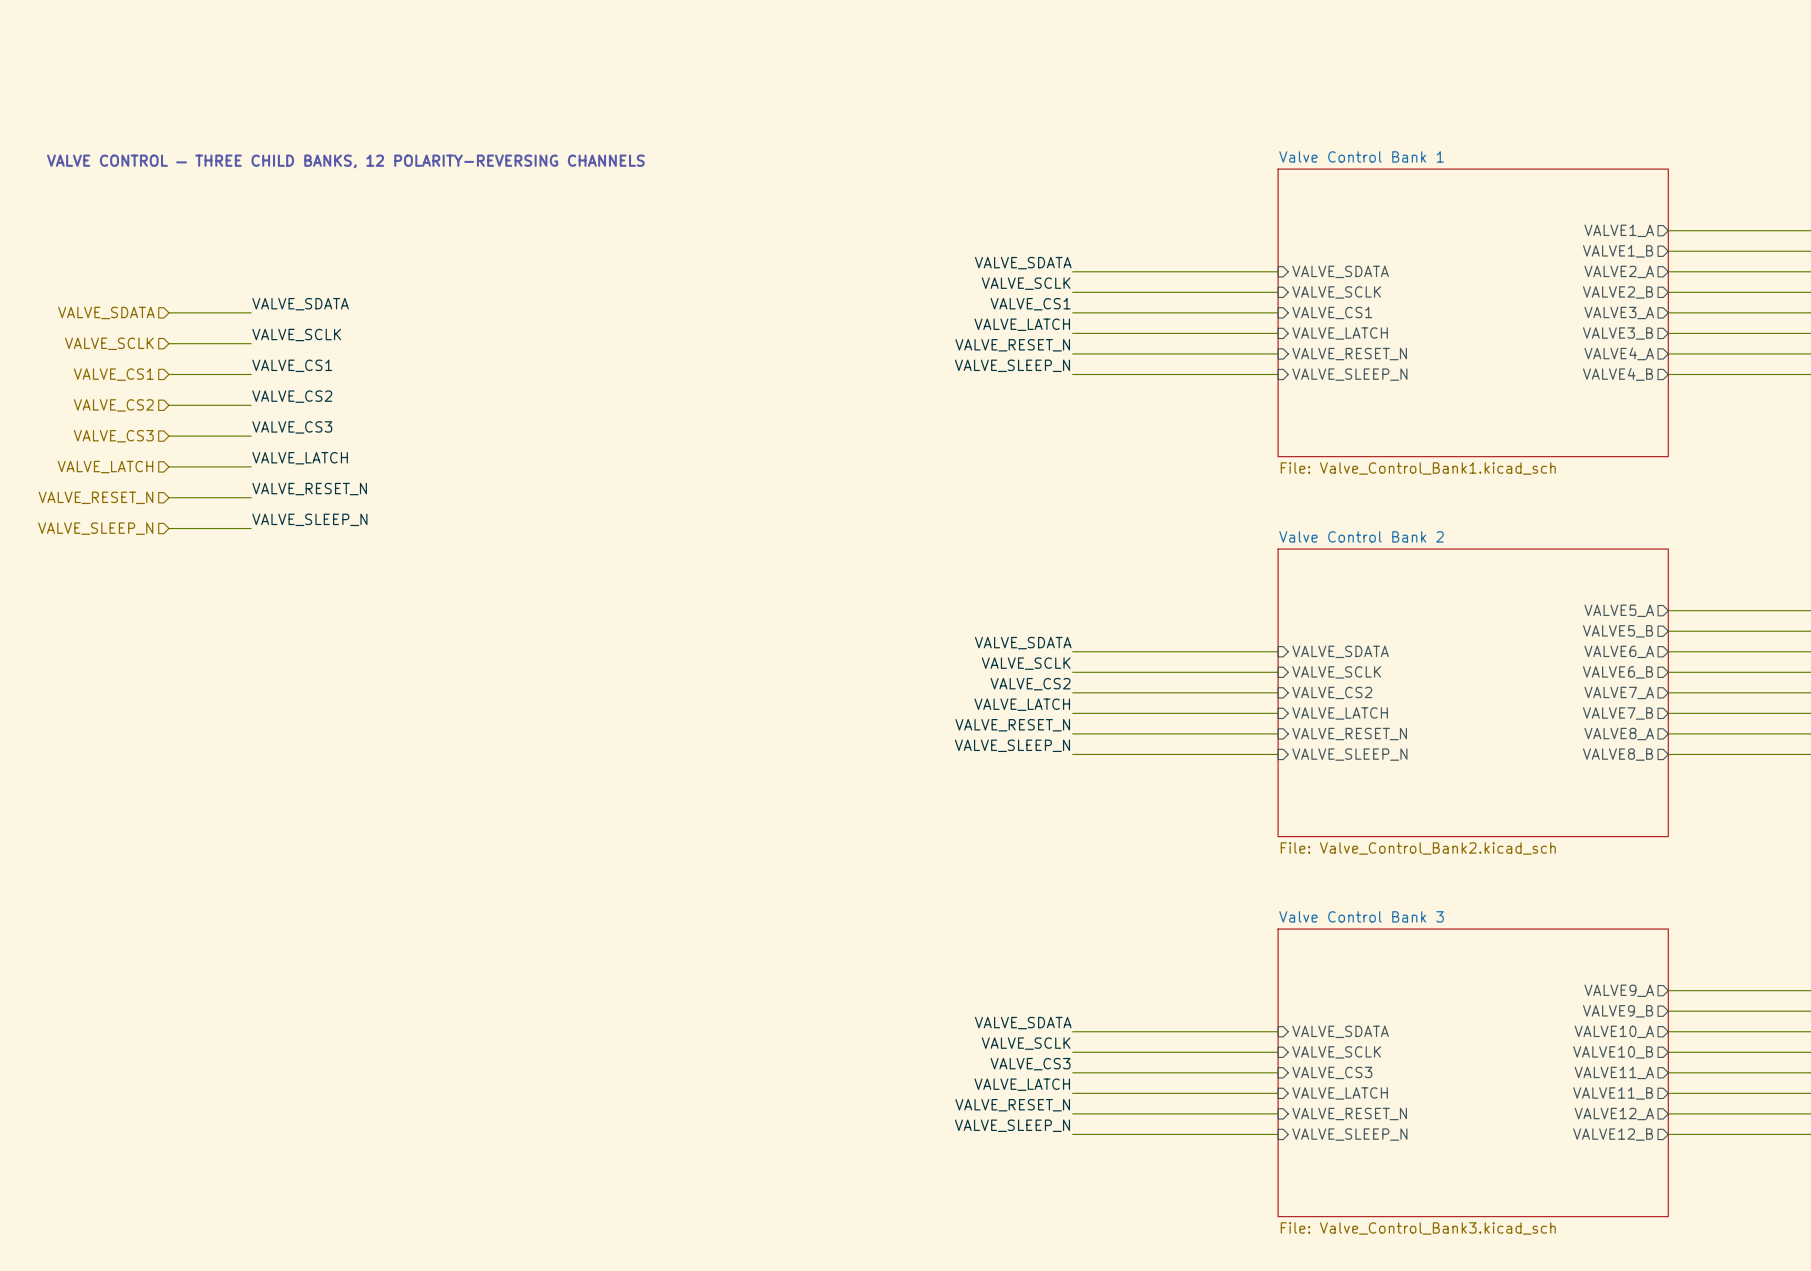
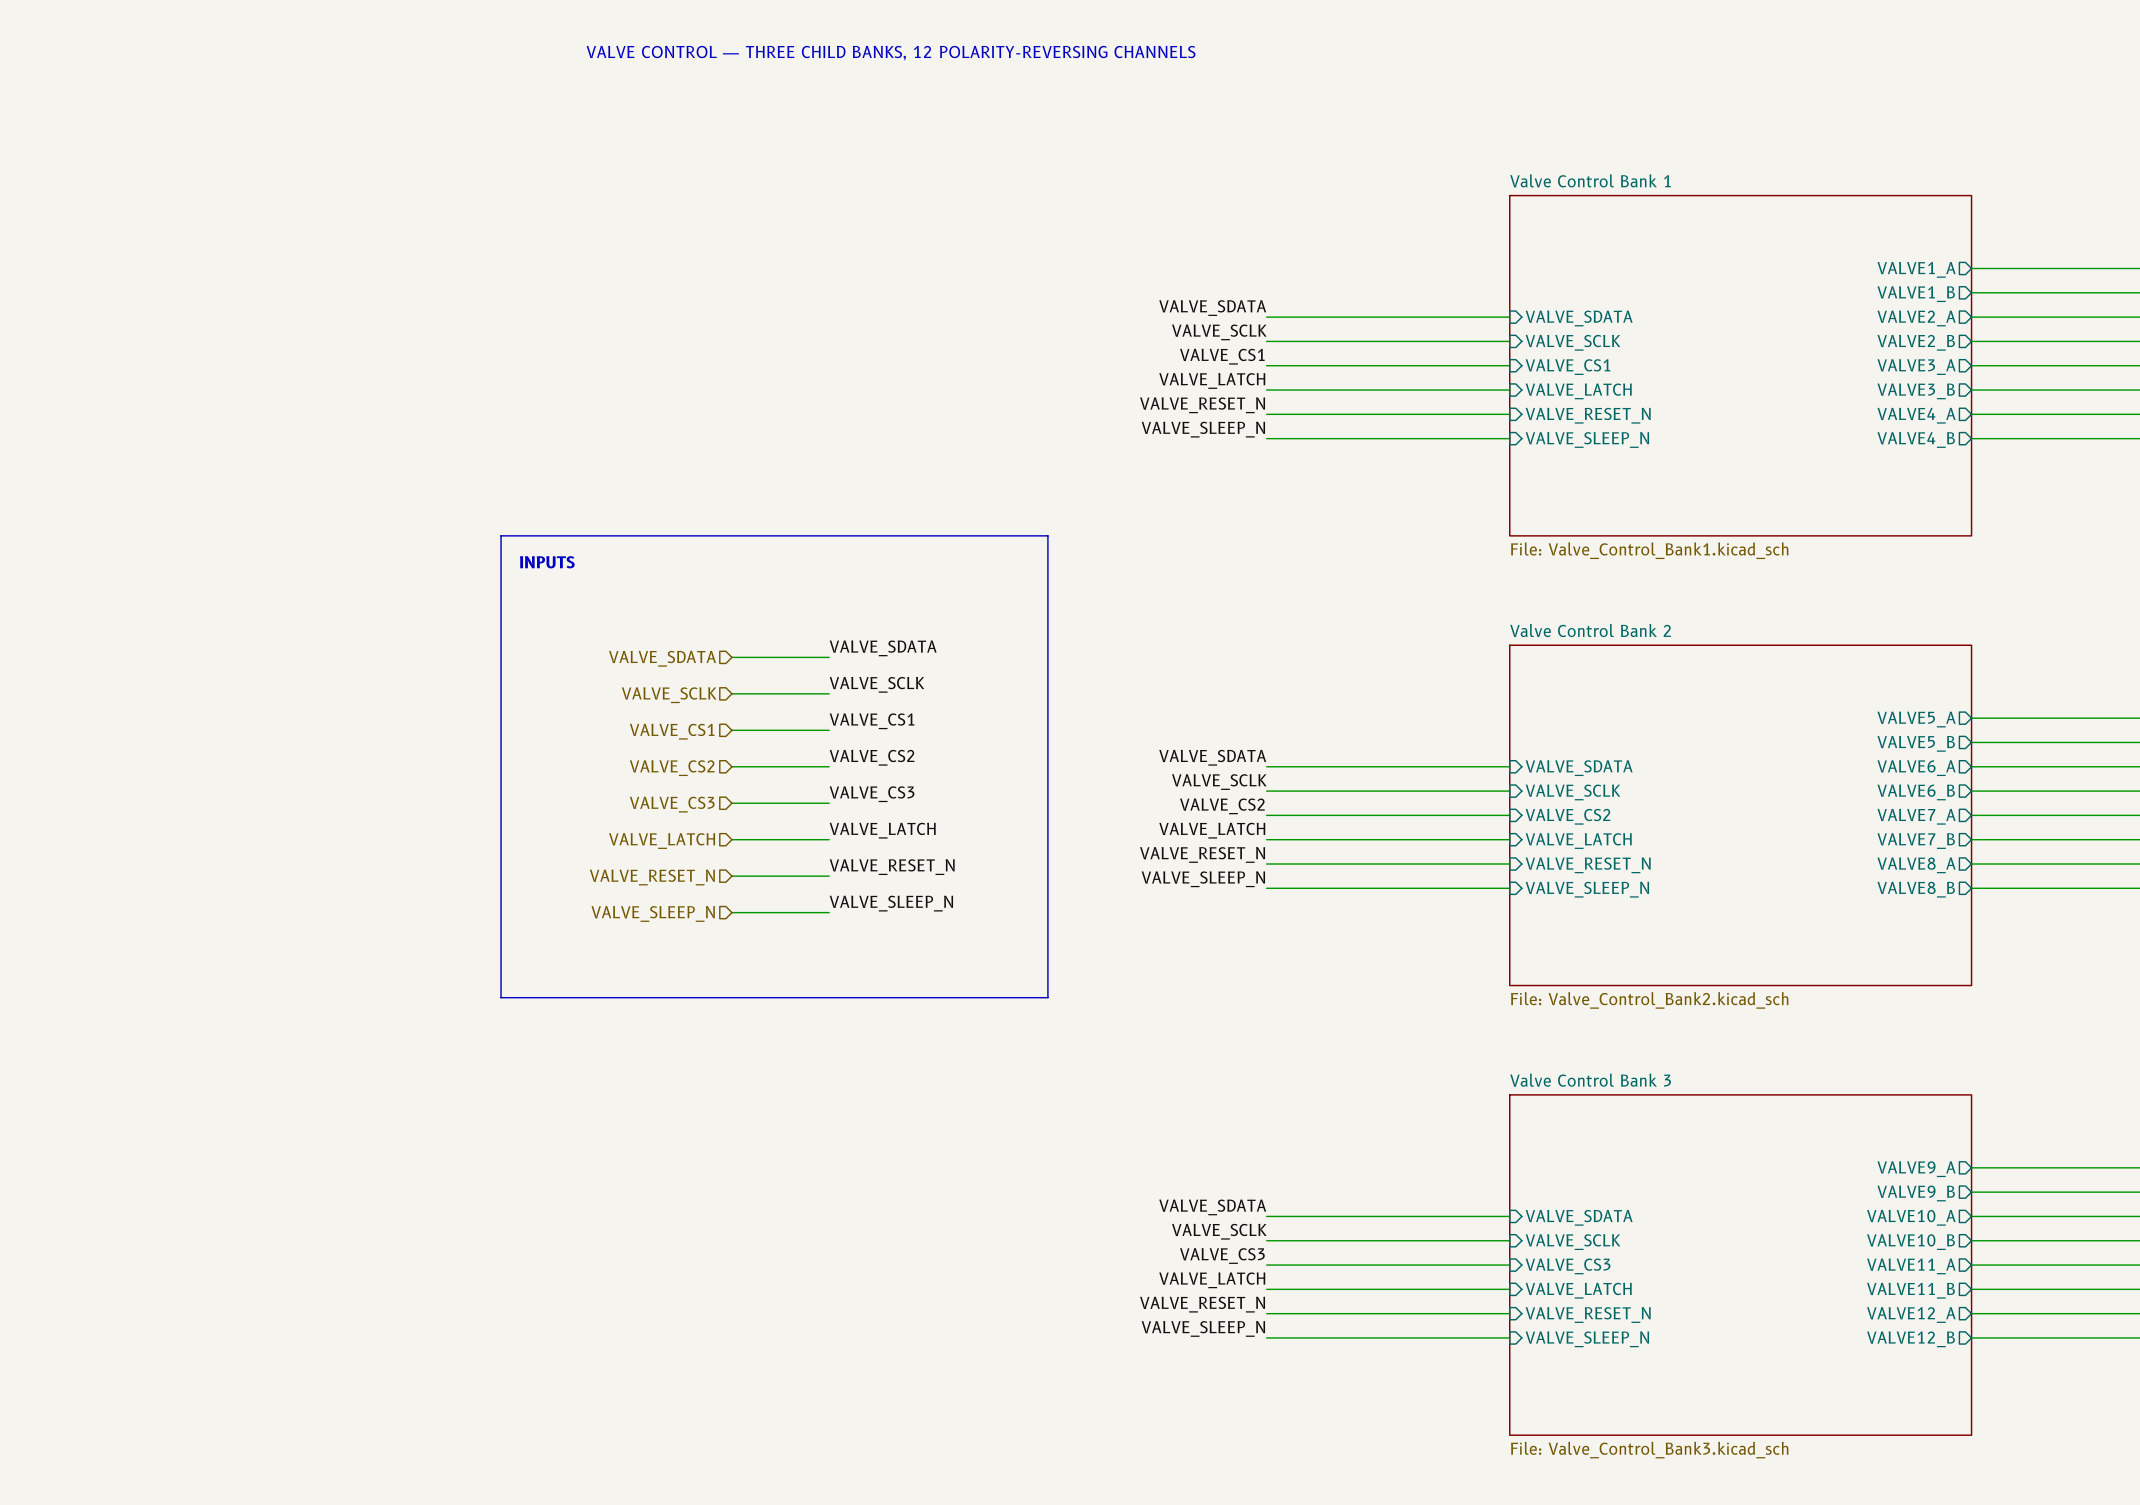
text: none -> VALVE CONTROL — THREE CHILD BANKS, 12 POLARITY-REVERSING CHANNELS (891, 53)
text: VALVE CONTROL — THREE CHILD BANKS, 12 POLARITY-REVERSING CHANNELS (345, 161) -> none
label: VALVE_SDATA (300, 304) -> none
hierarchical label: VALVE_SDATA (106, 312) -> none
wire: (168, 312) (251, 312) -> none
label: VALVE_SCLK (296, 335) -> none
hierarchical label: VALVE_SCLK (109, 343) -> none
wire: (168, 343) (251, 343) -> none
label: VALVE_CS1 (292, 365) -> none
hierarchical label: VALVE_CS1 (113, 374) -> none
wire: (168, 374) (251, 374) -> none
label: VALVE_CS2 (292, 396) -> none
hierarchical label: VALVE_CS2 (113, 405) -> none
wire: (168, 405) (251, 405) -> none
label: VALVE_CS3 (292, 427) -> none
hierarchical label: VALVE_CS3 (113, 436) -> none
wire: (168, 436) (251, 436) -> none
line: none -> (501, 535) (1047, 535) (1047, 997) (501, 997) (501, 535)
label: VALVE_LATCH (300, 458) -> none
wire: (168, 466) (251, 466) -> none
hierarchical label: VALVE_LATCH (105, 467) -> none
text: none -> INPUTS (547, 562)
label: VALVE_RESET_N (309, 489) -> none
hierarchical label: VALVE_RESET_N (95, 497) -> none
wire: (168, 497) (251, 497) -> none
label: VALVE_SLEEP_N (309, 519) -> none
hierarchical label: VALVE_SLEEP_N (95, 528) -> none
wire: (168, 528) (251, 528) -> none
label: none -> VALVE_SDATA (883, 648)
hierarchical label: none -> VALVE_SDATA (662, 658)
wire: none -> (731, 657) (829, 657)
label: none -> VALVE_SCLK (876, 684)
hierarchical label: none -> VALVE_SCLK (669, 695)
wire: none -> (731, 693) (829, 693)
label: none -> VALVE_CS1 (872, 721)
wire: none -> (731, 730) (829, 730)
hierarchical label: none -> VALVE_CS1 (672, 731)
label: none -> VALVE_CS2 (872, 757)
hierarchical label: none -> VALVE_CS2 (672, 768)
wire: none -> (731, 766) (829, 766)
label: none -> VALVE_CS3 (872, 794)
hierarchical label: none -> VALVE_CS3 (672, 804)
wire: none -> (731, 803) (829, 803)
label: none -> VALVE_LATCH (882, 830)
hierarchical label: none -> VALVE_LATCH (662, 841)
wire: none -> (731, 839) (829, 839)
label: none -> VALVE_RESET_N (892, 867)
hierarchical label: none -> VALVE_RESET_N (652, 877)
wire: none -> (731, 876) (829, 876)
label: none -> VALVE_SLEEP_N (891, 903)
hierarchical label: none -> VALVE_SLEEP_N (653, 913)
wire: none -> (731, 912) (829, 912)

